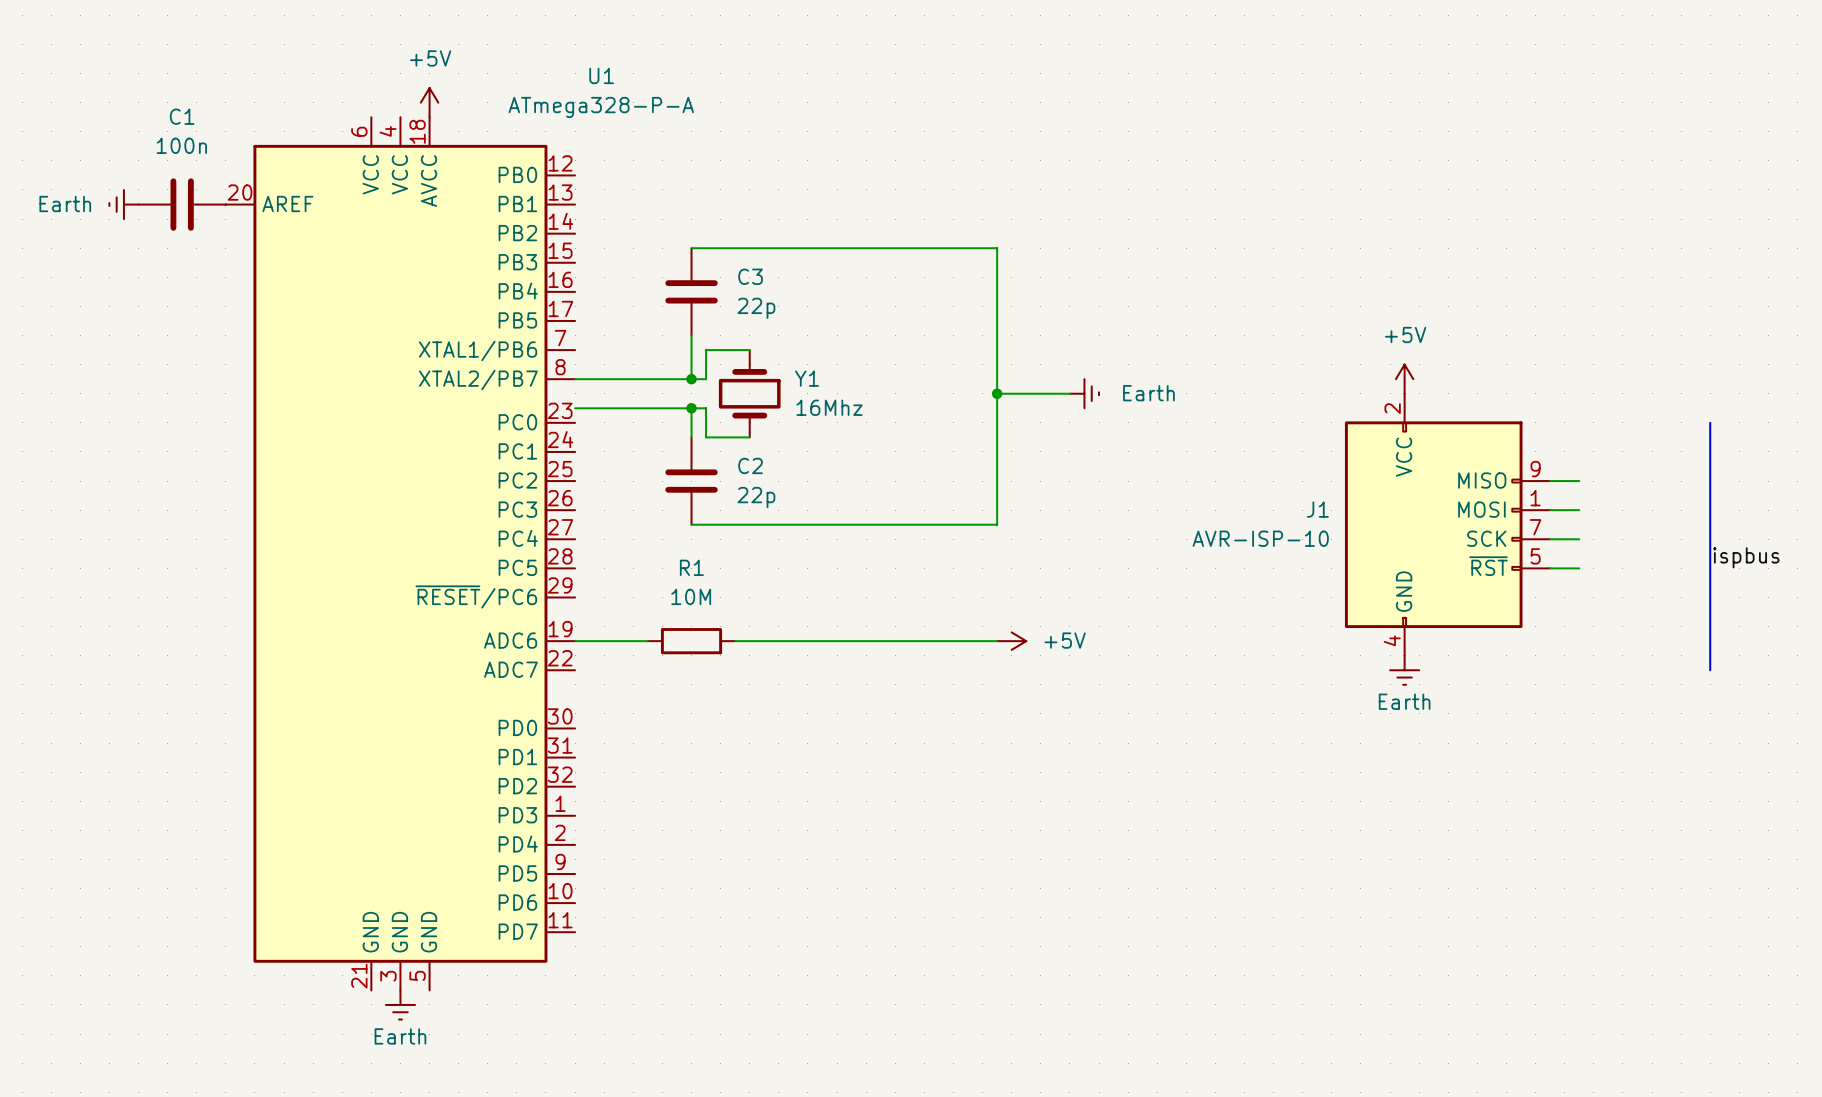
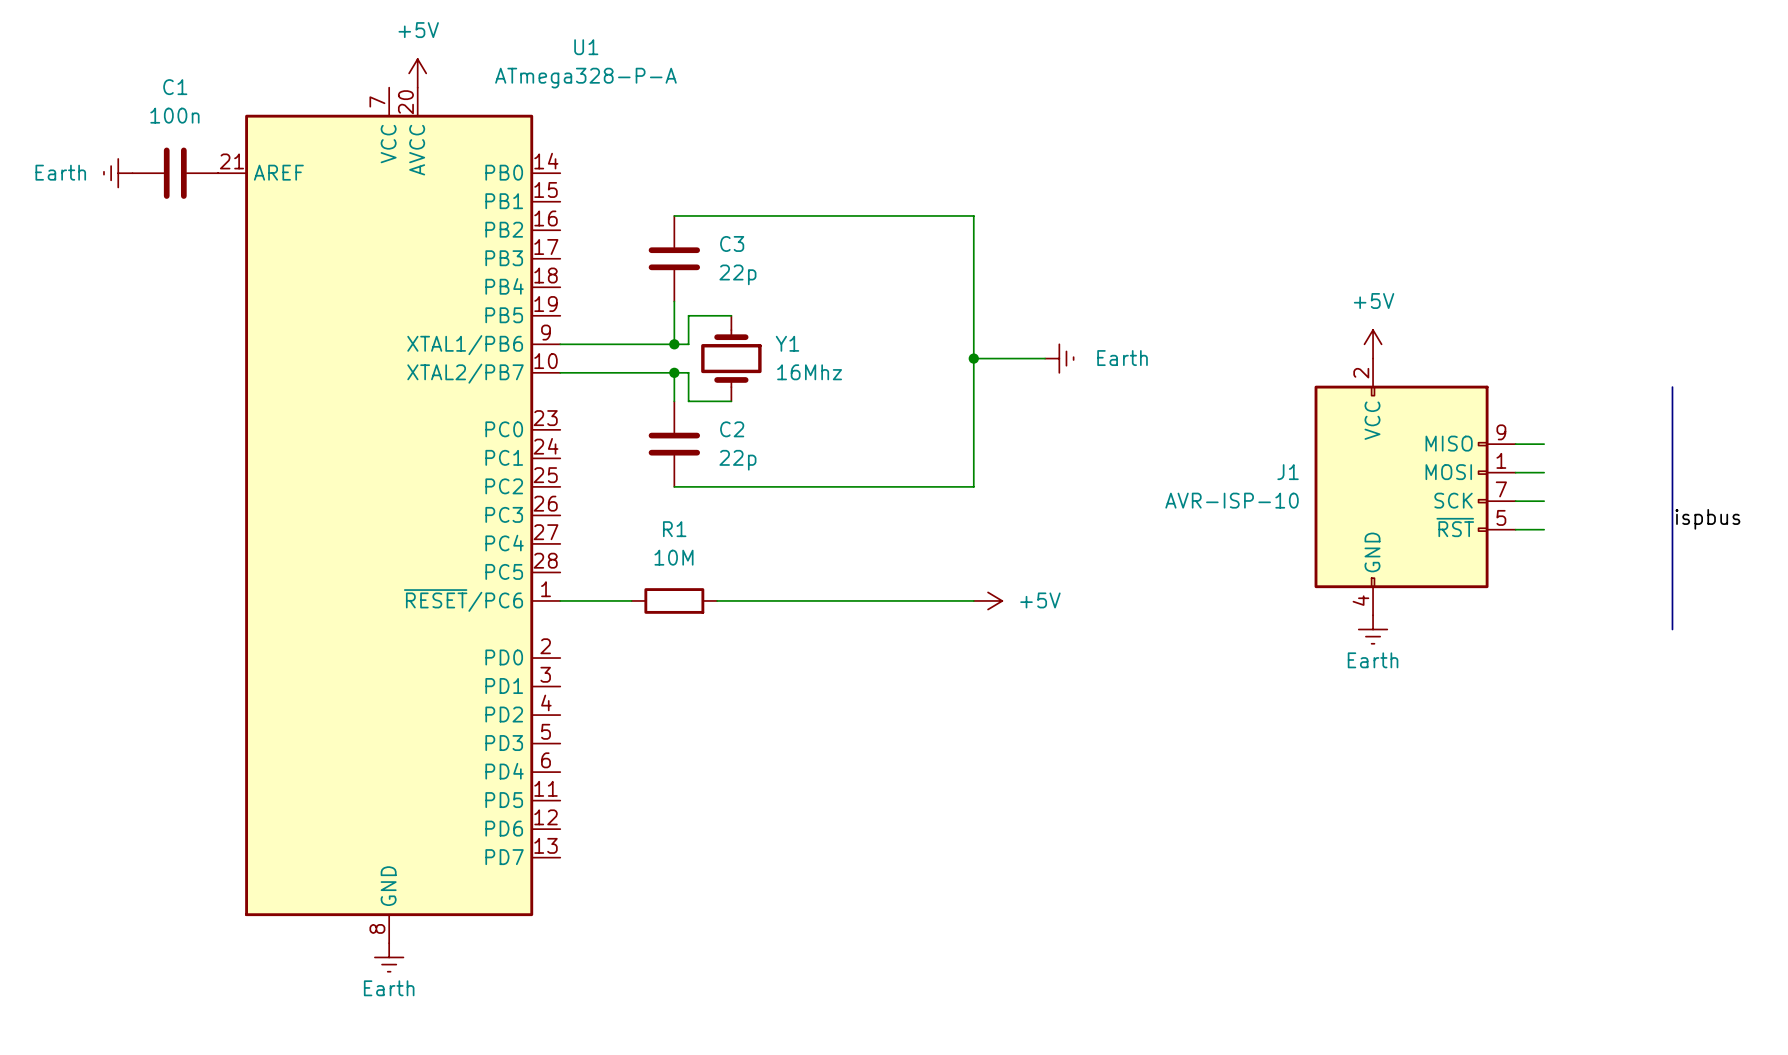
U1 symbol: [225, 117, 576, 991] -> [218, 87, 561, 944]

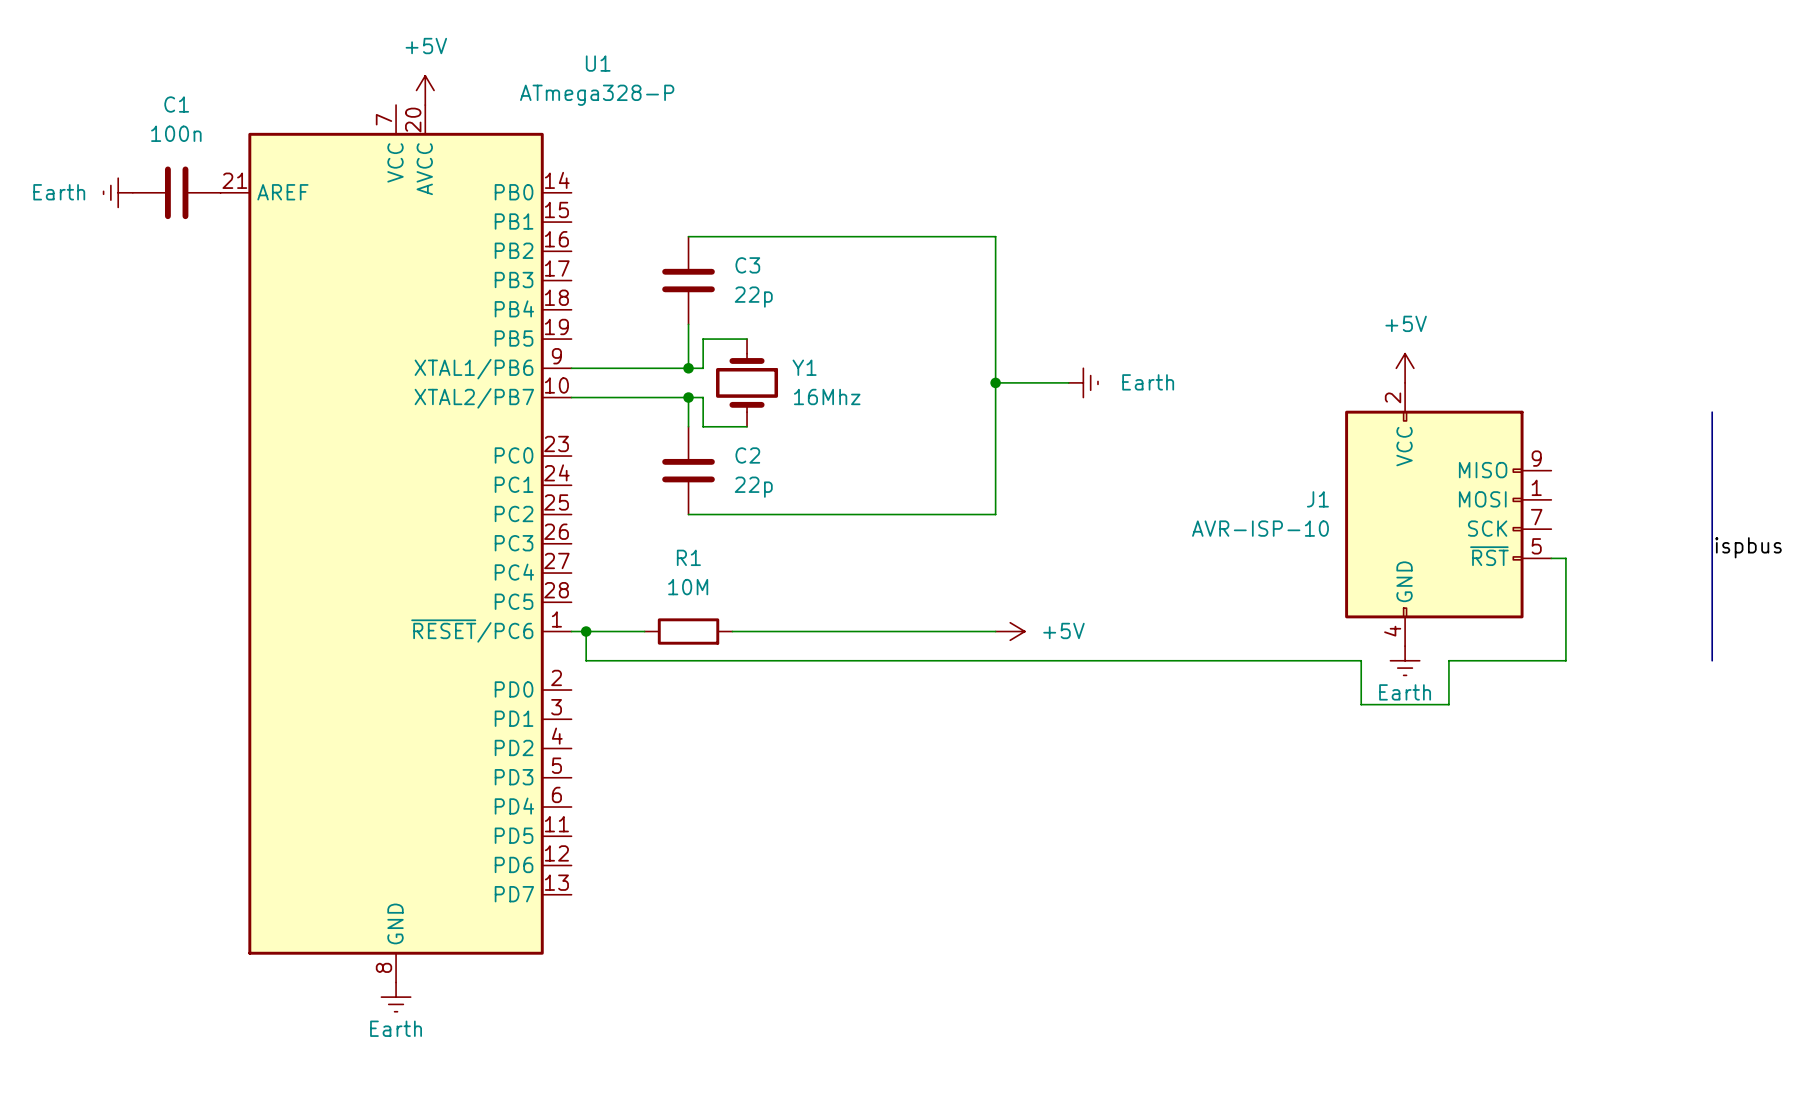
U1 value: ATmega328-P-A (585, 78) -> ATmega328-P (597, 95)
wire: (1515, 444) (1544, 444) -> none
wire: (1515, 472) (1544, 472) -> none
wire: (1515, 501) (1544, 501) -> none
wire: (1529, 529) (1544, 529) -> (1565, 558) (1565, 660) (1448, 660) (1448, 704) (1361, 704) (1361, 660) (586, 660) (586, 631)
junction: none -> (586, 631)

